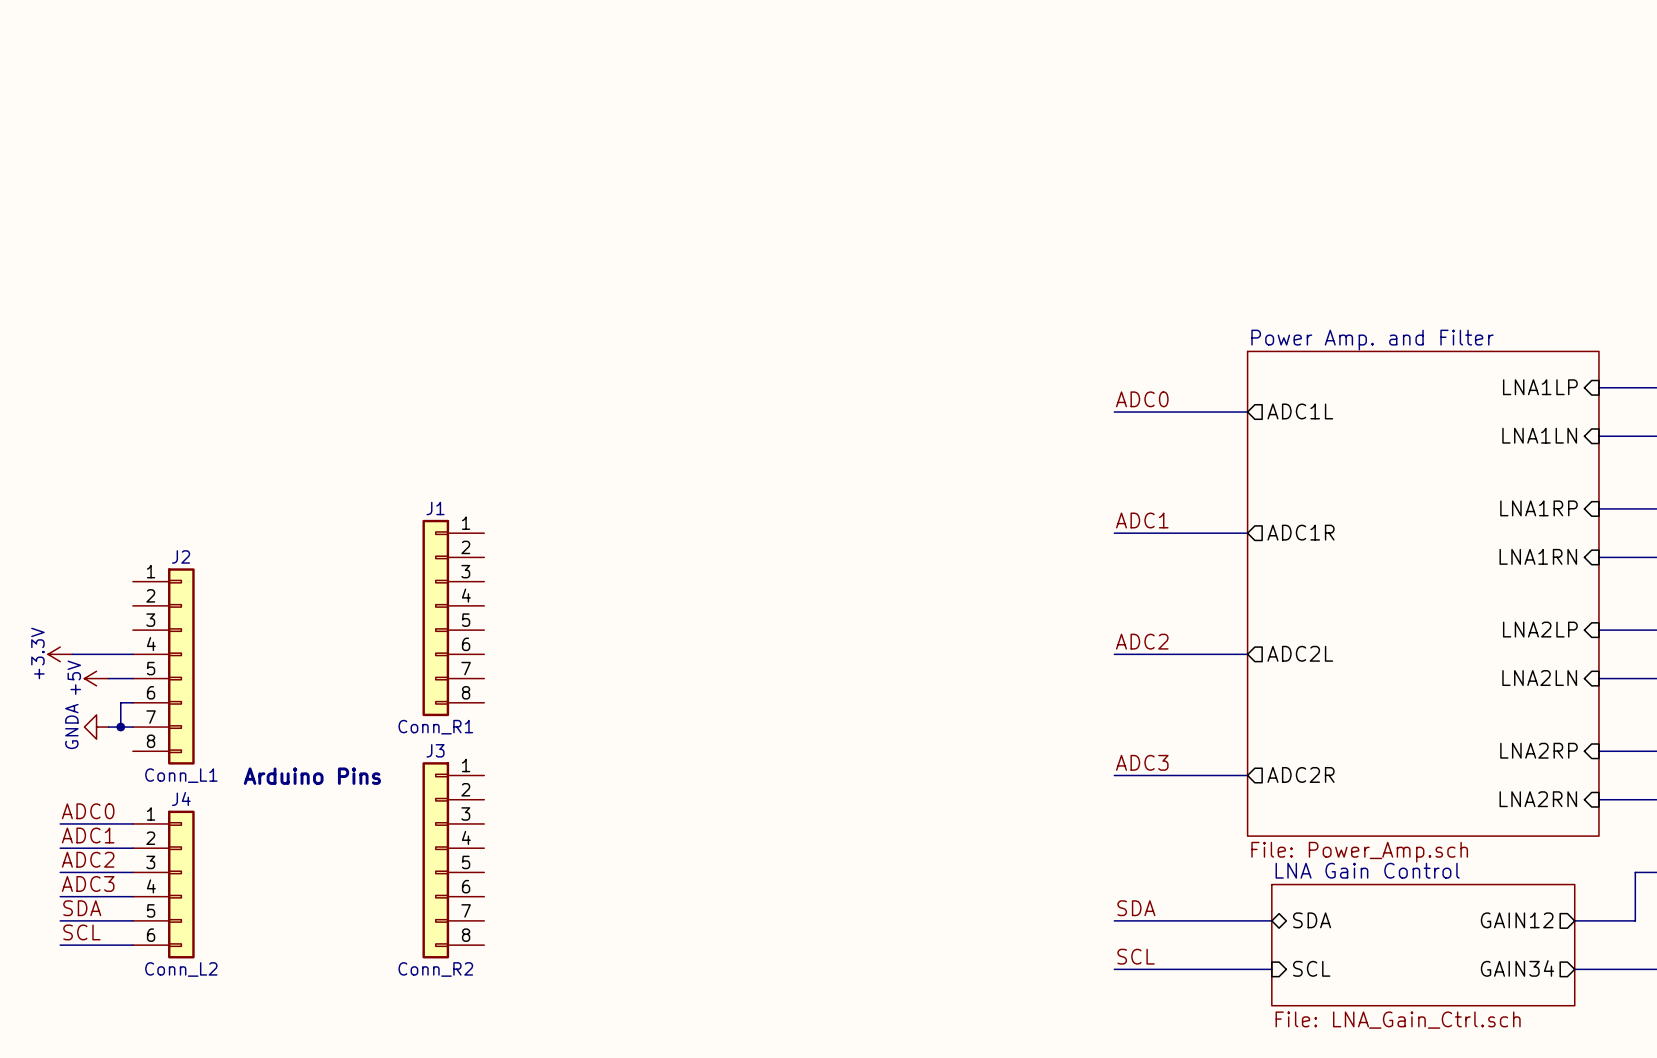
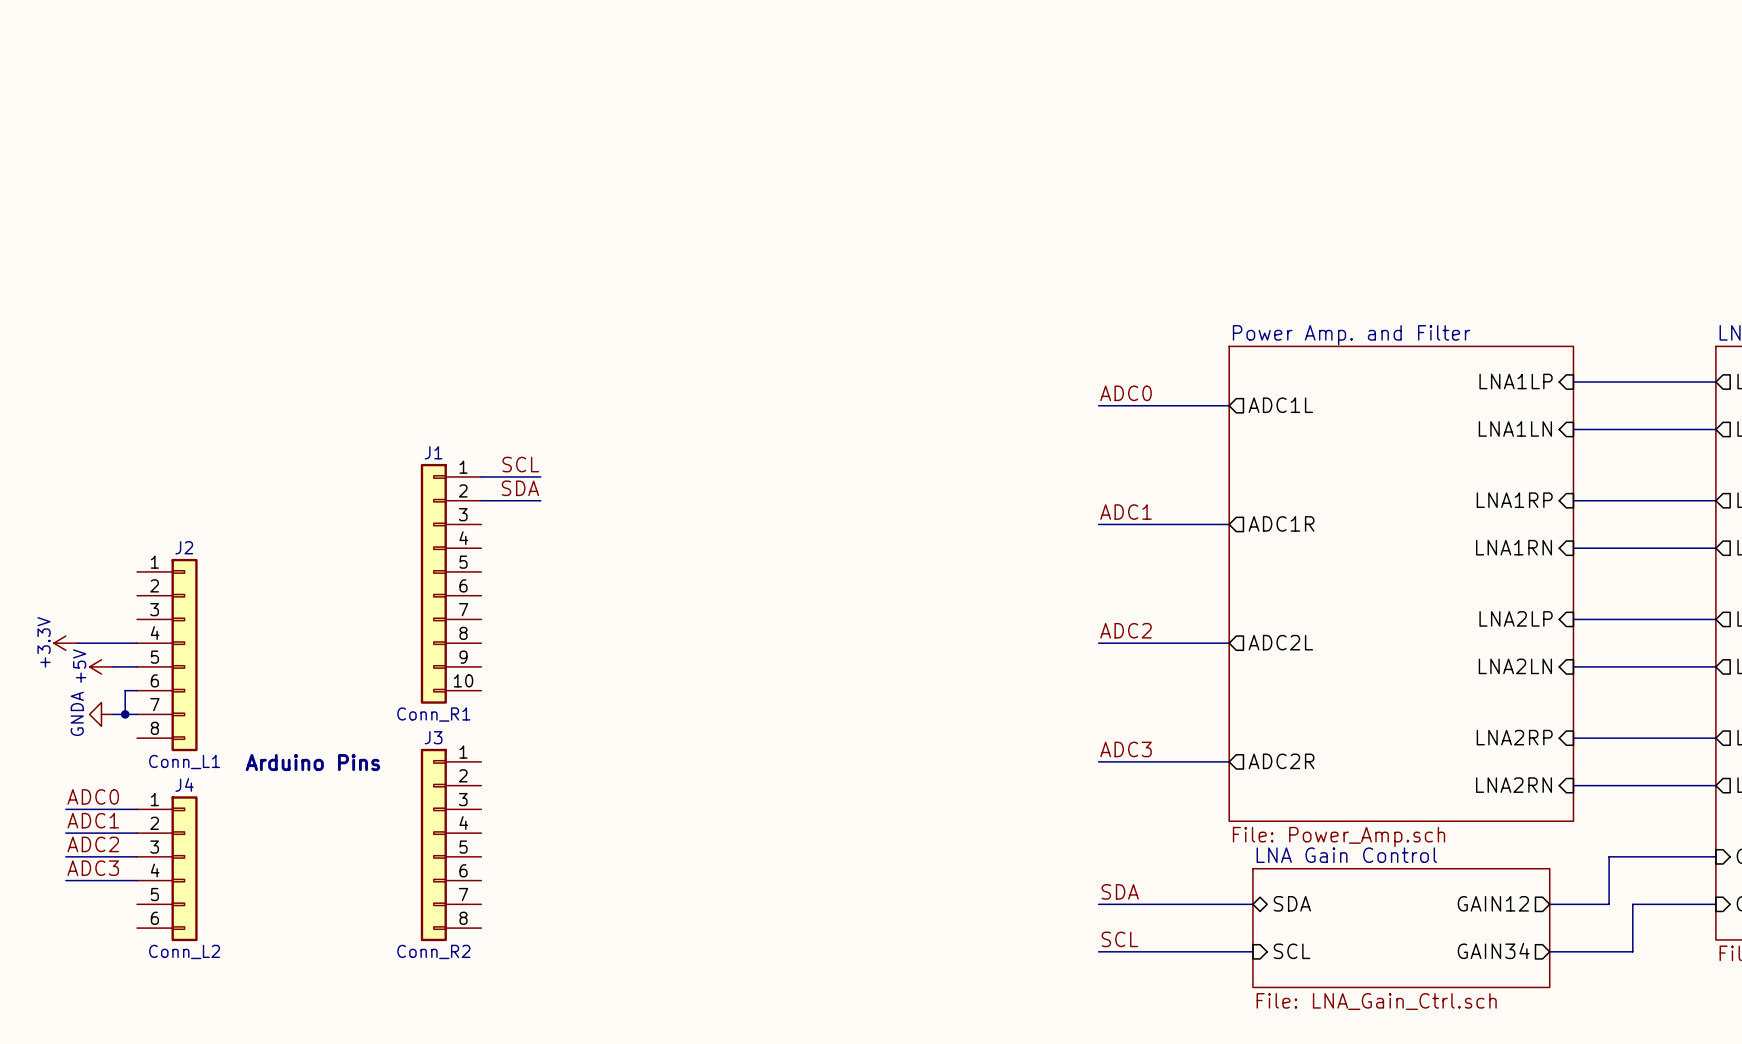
label: none -> SCL (520, 464)
wire: none -> (481, 476) (540, 476)
label: none -> SDA (520, 488)
J1 name position: J1 (435, 508) -> J1 (433, 452)
wire: none -> (481, 500) (540, 500)
J1 symbol: [422, 519, 485, 717] -> [420, 463, 482, 704]
label: SDA (82, 908) -> none
wire: (60, 920) (132, 920) -> none
label: SCL (81, 932) -> none
wire: (60, 945) (132, 945) -> none

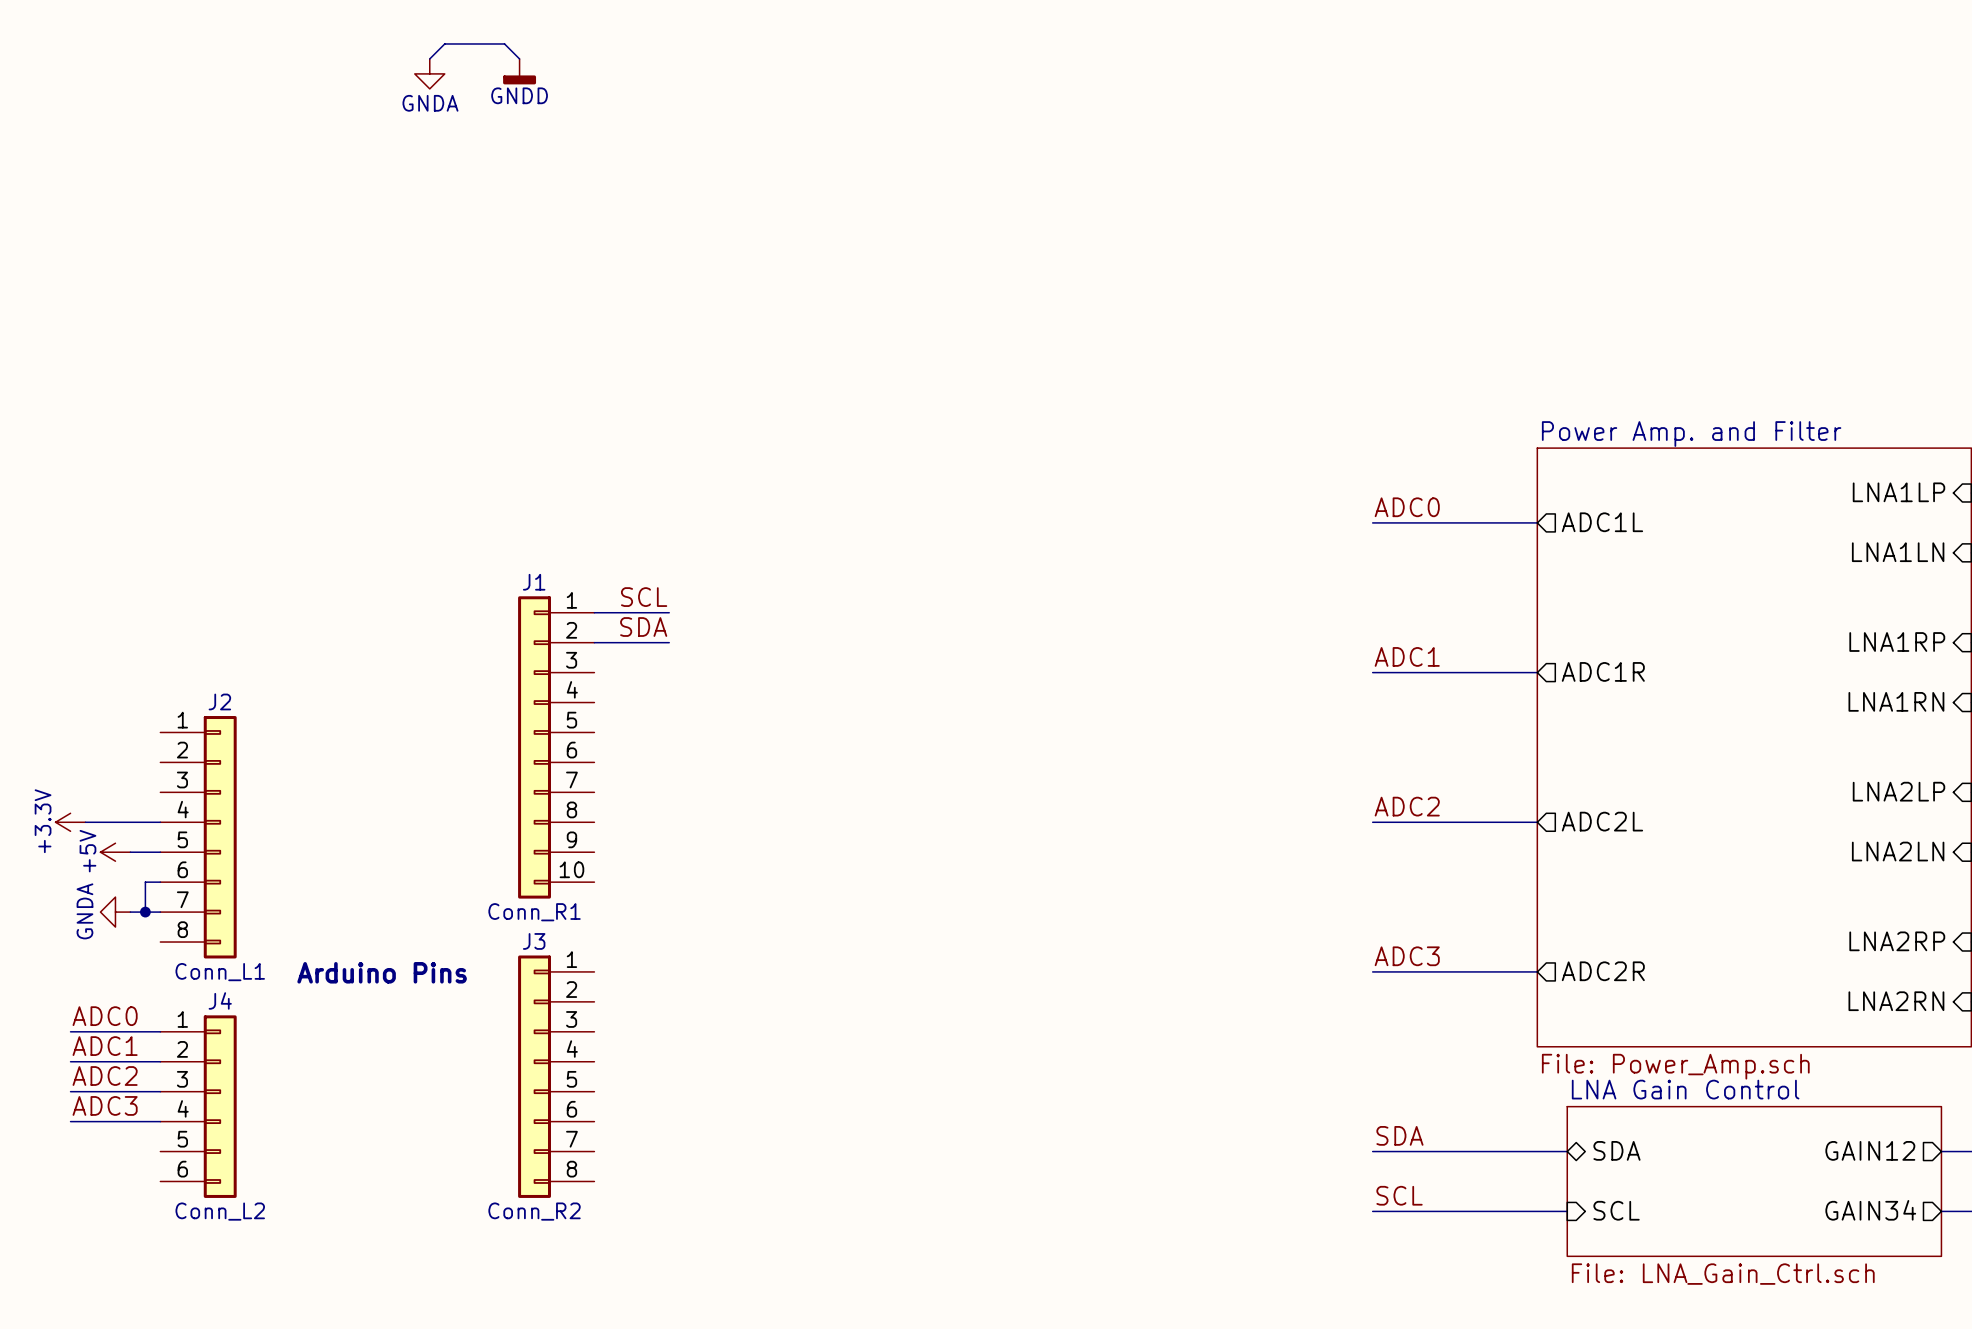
wire: none -> (429, 58) (444, 43) (504, 43) (519, 58)
power symbol: none -> GNDD (519, 71)
power symbol: none -> GNDA (429, 73)

